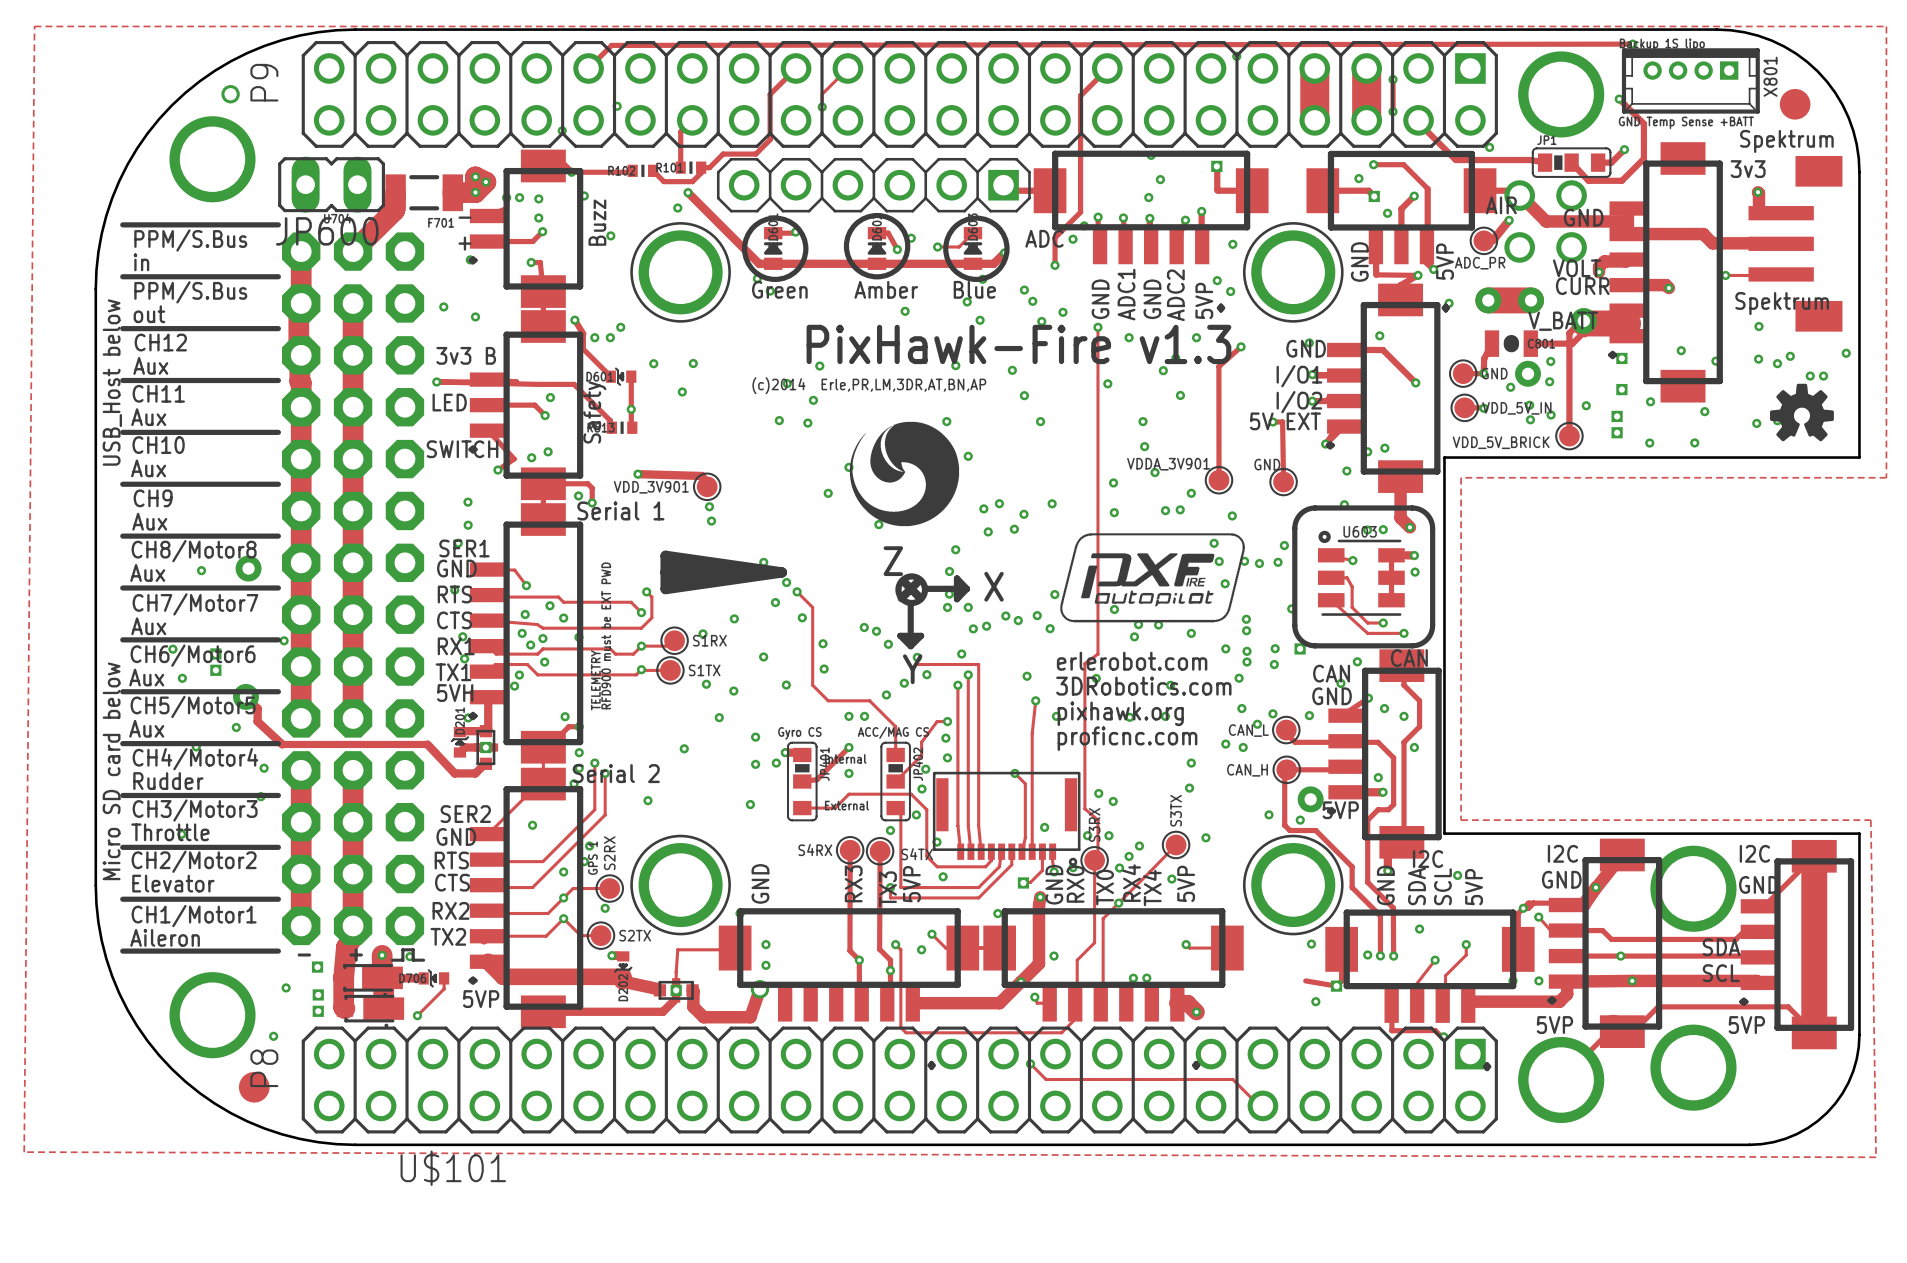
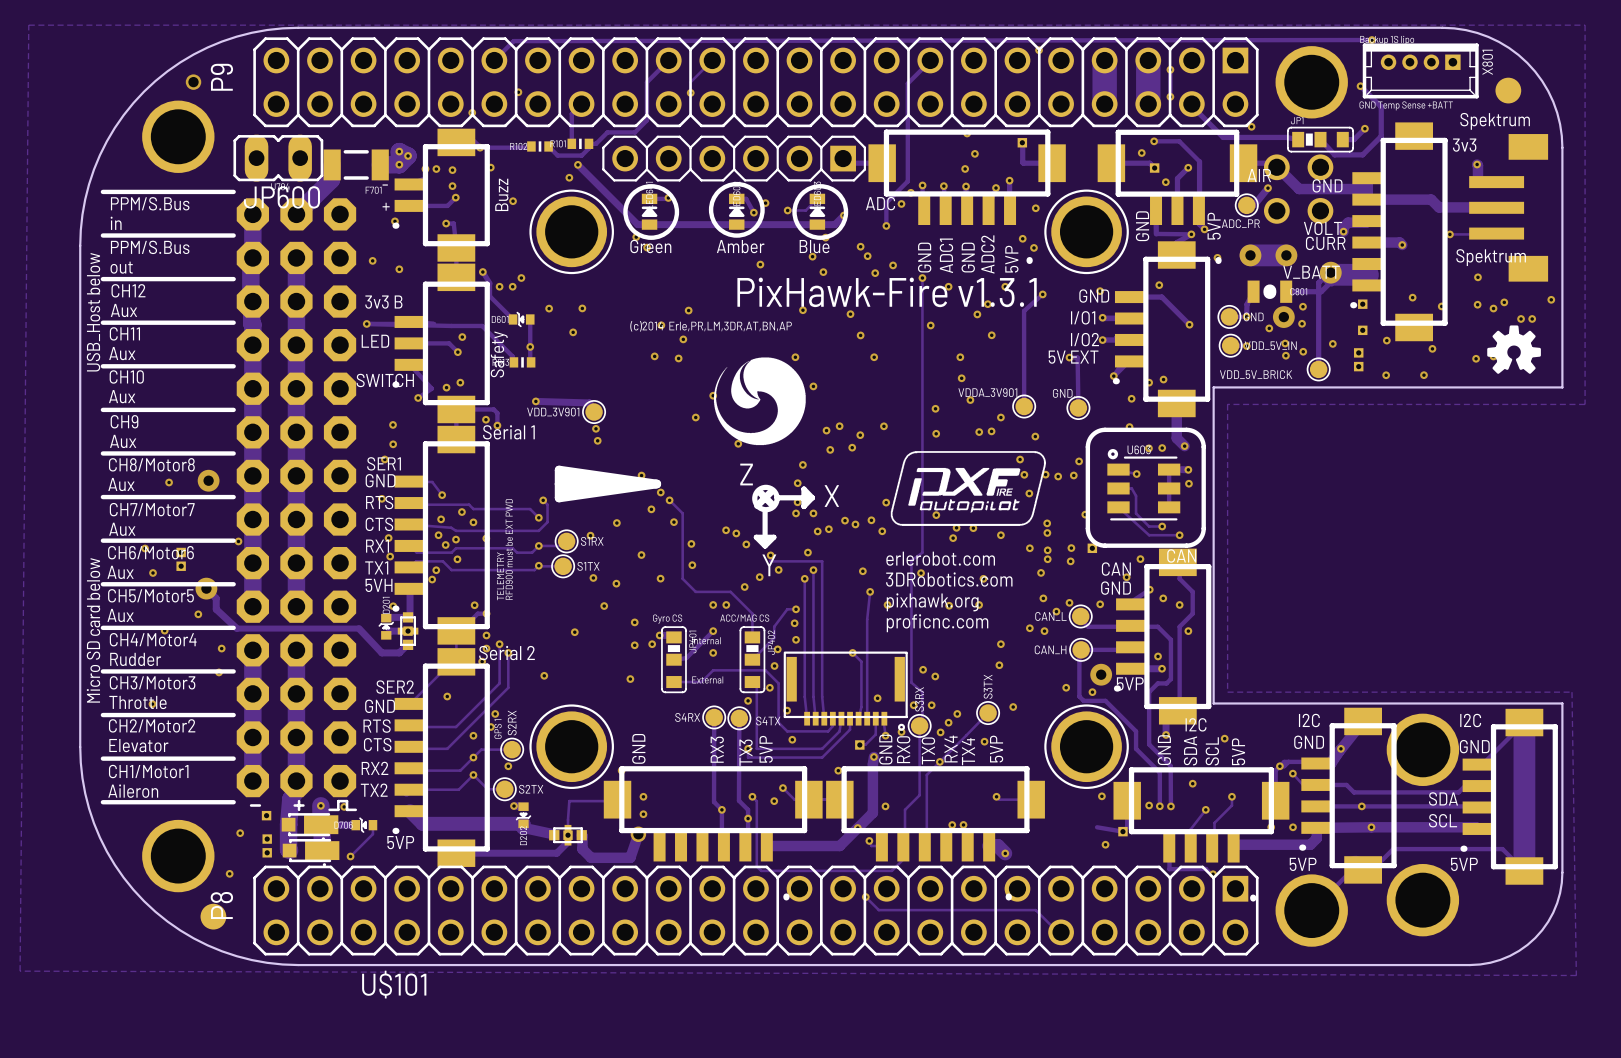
text: PixHawk-Fire v1.3 (1018, 344) -> PixHawk-Fire v1.3.1 (887, 292)

